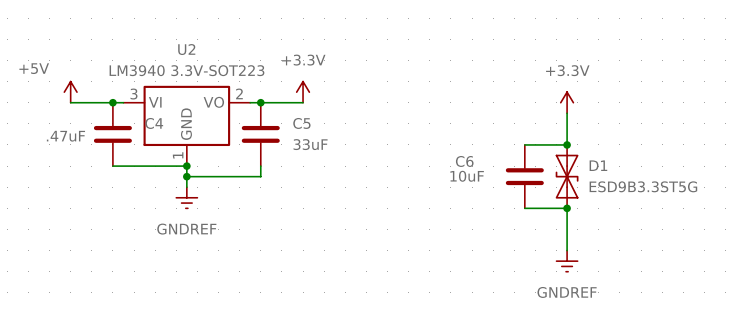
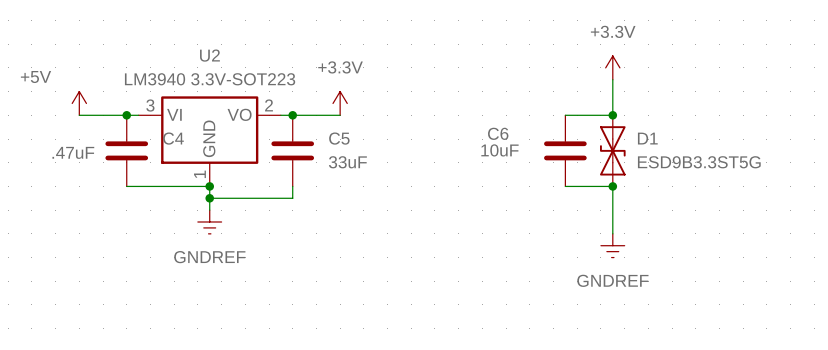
junction: none -> (612, 115)
power symbol position: +3.3V (567, 102) -> +3.3V (612, 67)
wire: (567, 113) (567, 144) (524, 144) -> (612, 79) (612, 115) (565, 115)
junction: (567, 144) -> none
junction: none -> (612, 186)
C6 position: (524, 176) -> (565, 150)
D1 position: (567, 176) -> (612, 150)
wire: (524, 208) (567, 208) (567, 250) -> (565, 186) (612, 186) (612, 233)
junction: (567, 208) -> none
power symbol position: GNDREF (567, 261) -> GNDREF (612, 245)

